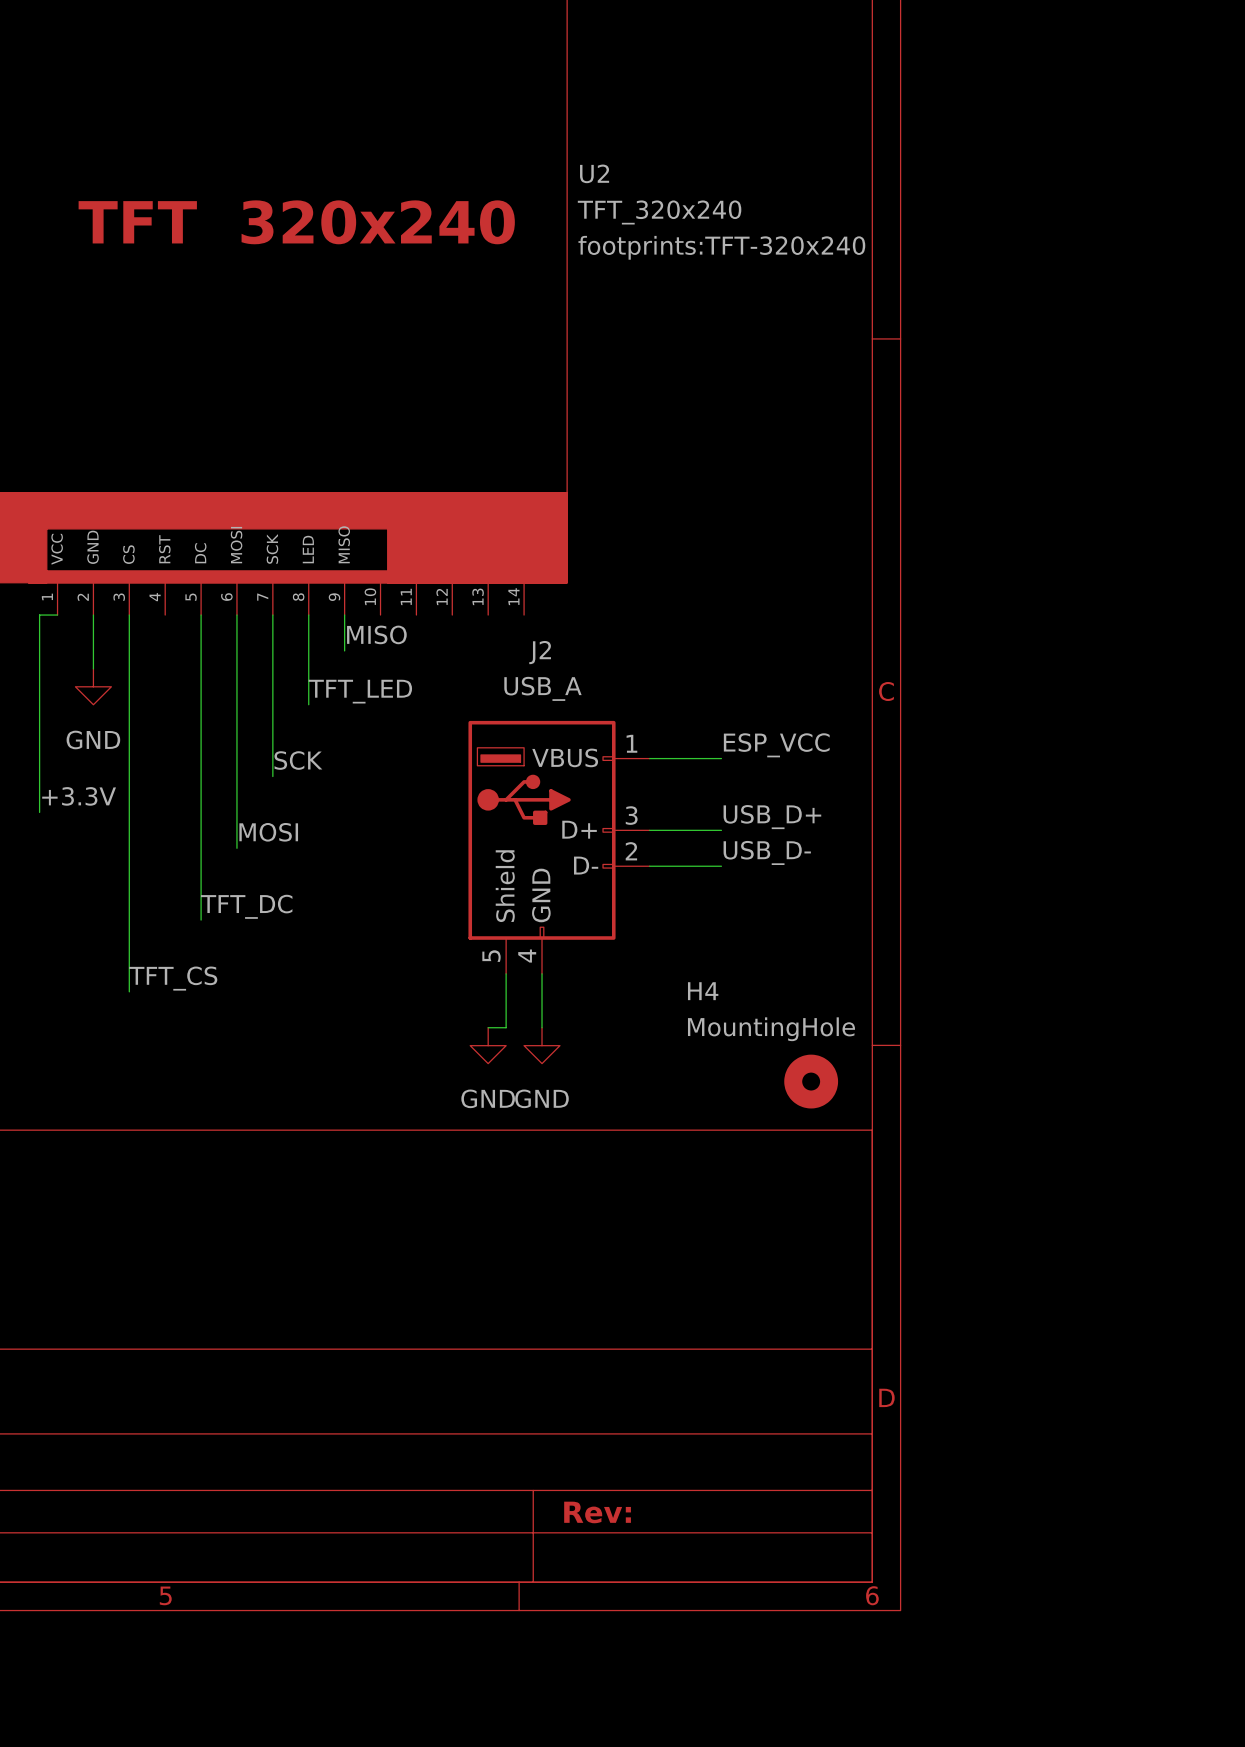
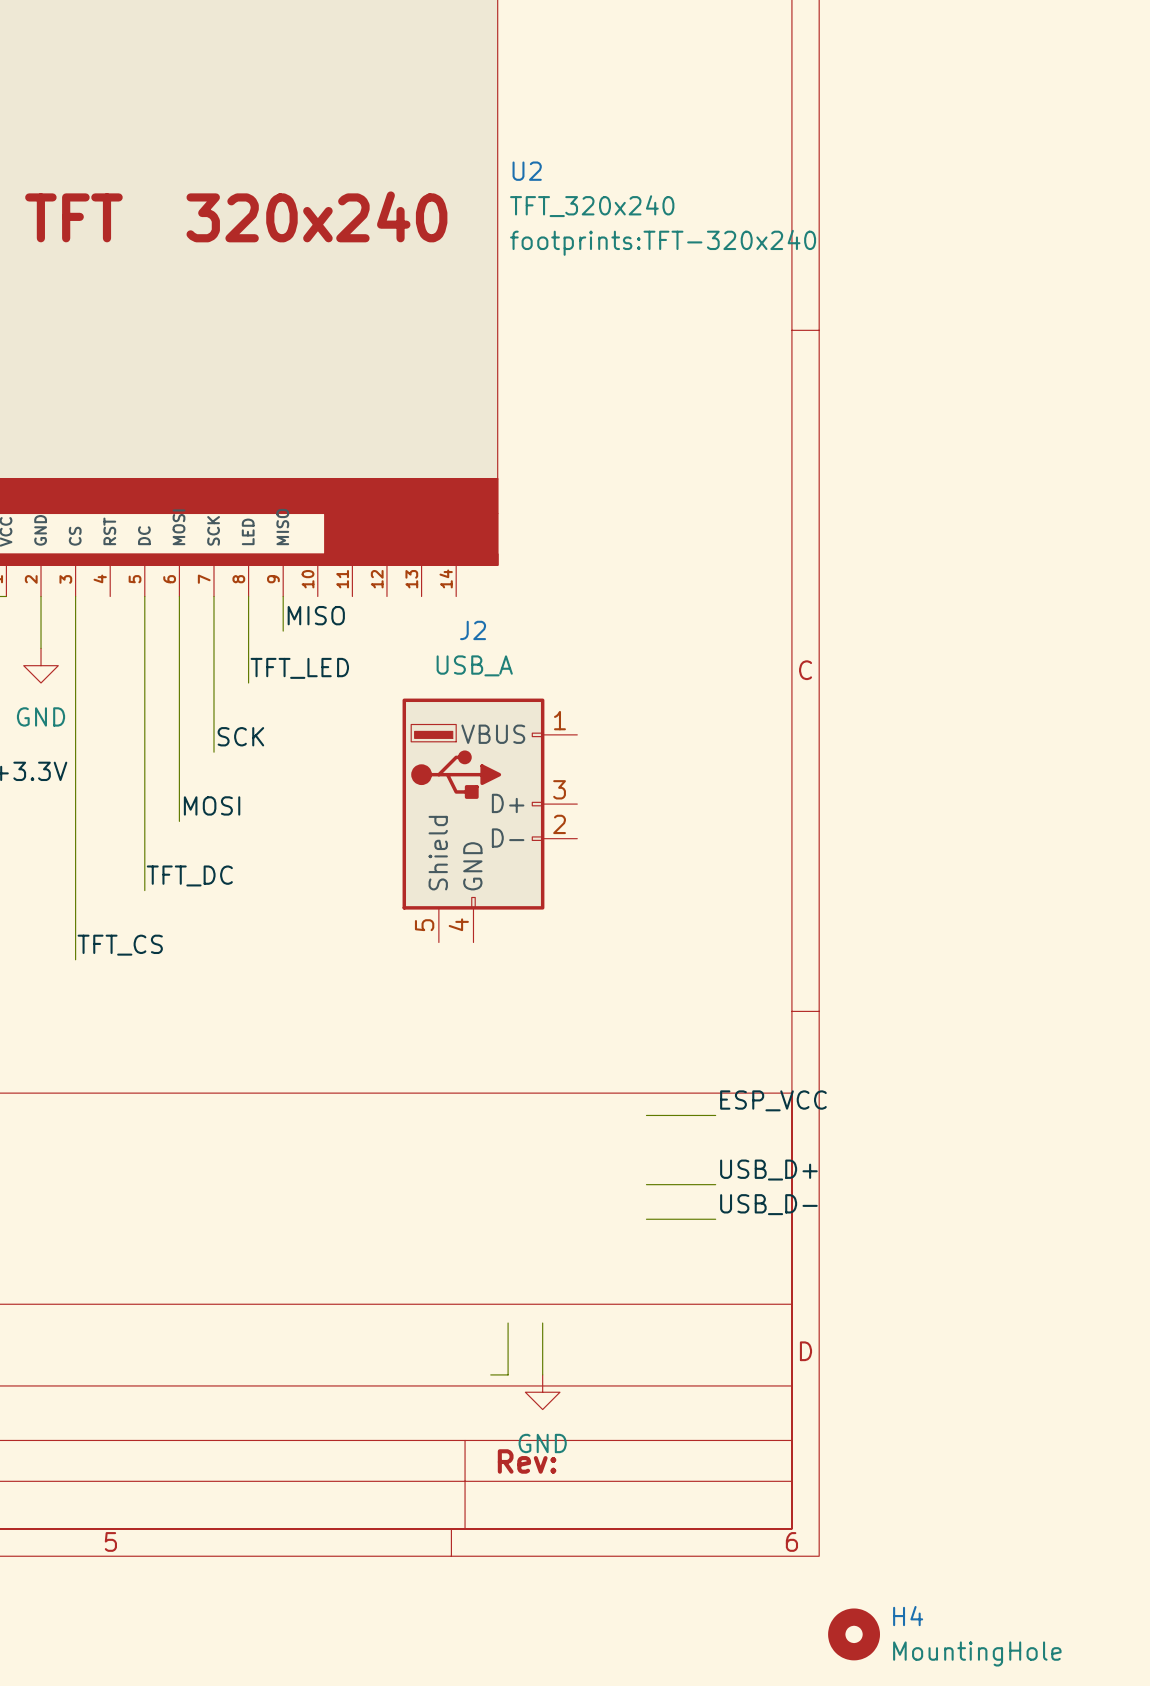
label: ESP_VCC (776, 745) -> none
wire: (649, 758) (721, 758) -> none
label: USB_D+ (772, 817) -> none
wire: (649, 830) (721, 830) -> none
label: USB_D- (767, 852) -> none
wire: (649, 866) (721, 866) -> (646, 1115) (715, 1115)
wire: (506, 973) (506, 1027) (488, 1027) -> none
wire: (542, 973) (542, 1027) -> none
H4 name position: H4 (703, 991) -> H4 (908, 1616)
H4 value position: MountingHole (771, 1029) -> MountingHole (977, 1653)
power symbol: GND (488, 1045) -> none
power symbol: GND (542, 1045) -> none
H4 position: (811, 1081) -> (854, 1634)
label: none -> ESP_VCC (773, 1100)
label: none -> USB_D+ (768, 1170)
wire: none -> (646, 1184) (715, 1184)
label: none -> USB_D- (768, 1204)
wire: none -> (646, 1219) (715, 1219)
wire: none -> (508, 1323) (508, 1374) (490, 1374)
wire: none -> (542, 1323) (542, 1374)
power symbol: none -> GND (542, 1392)

